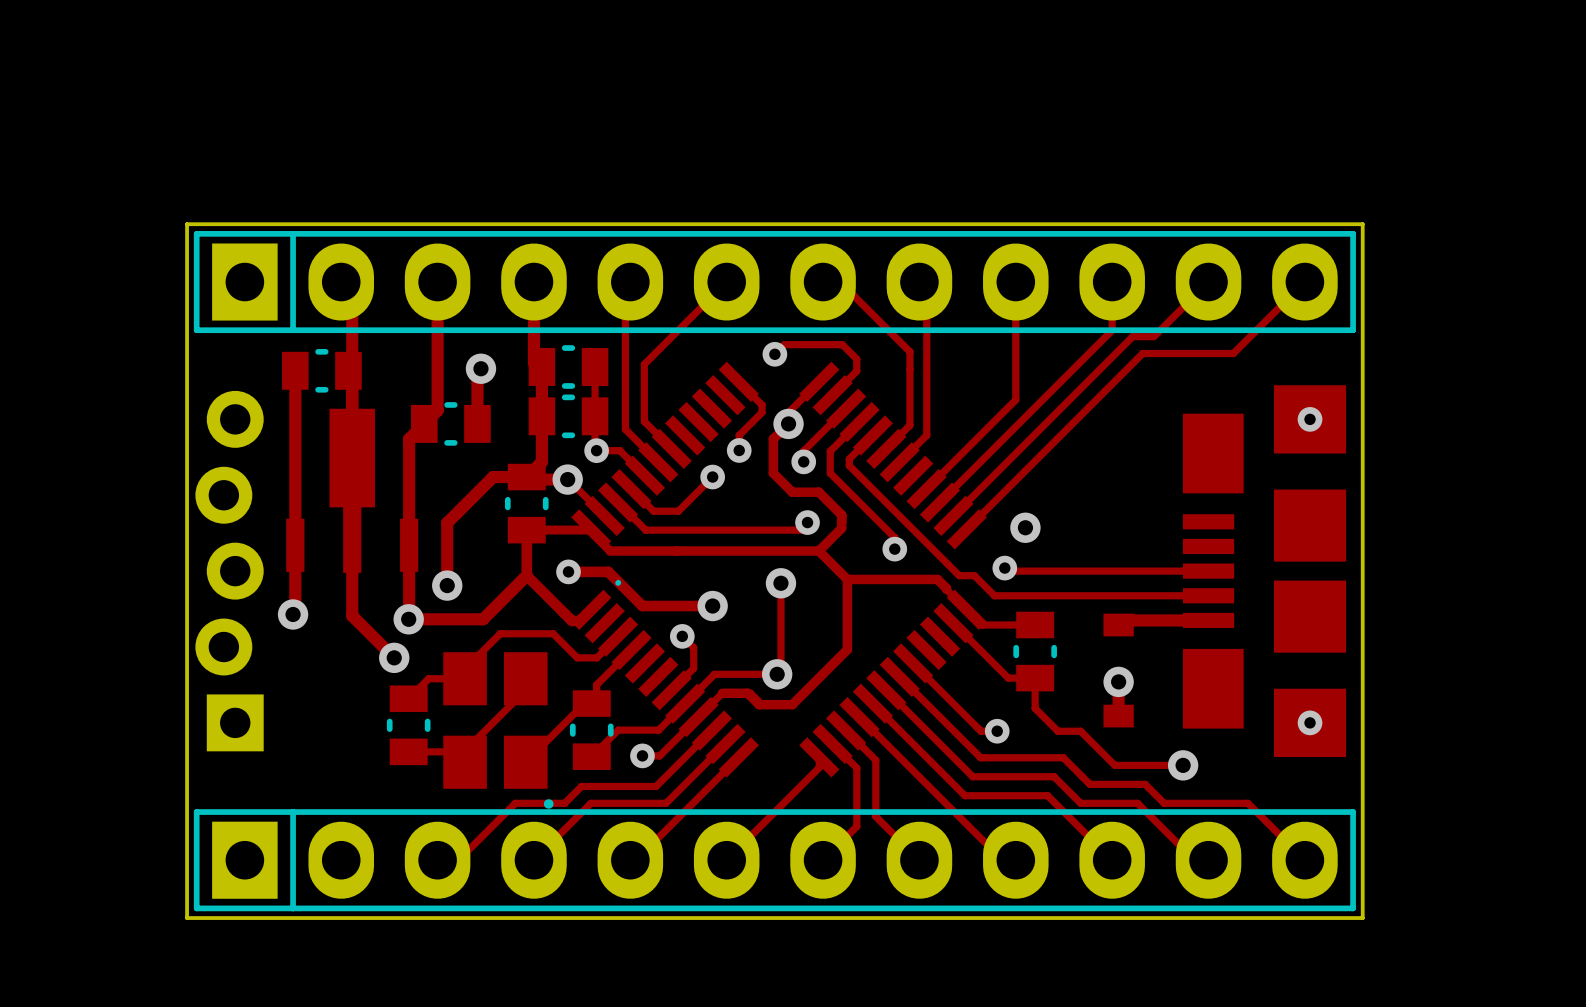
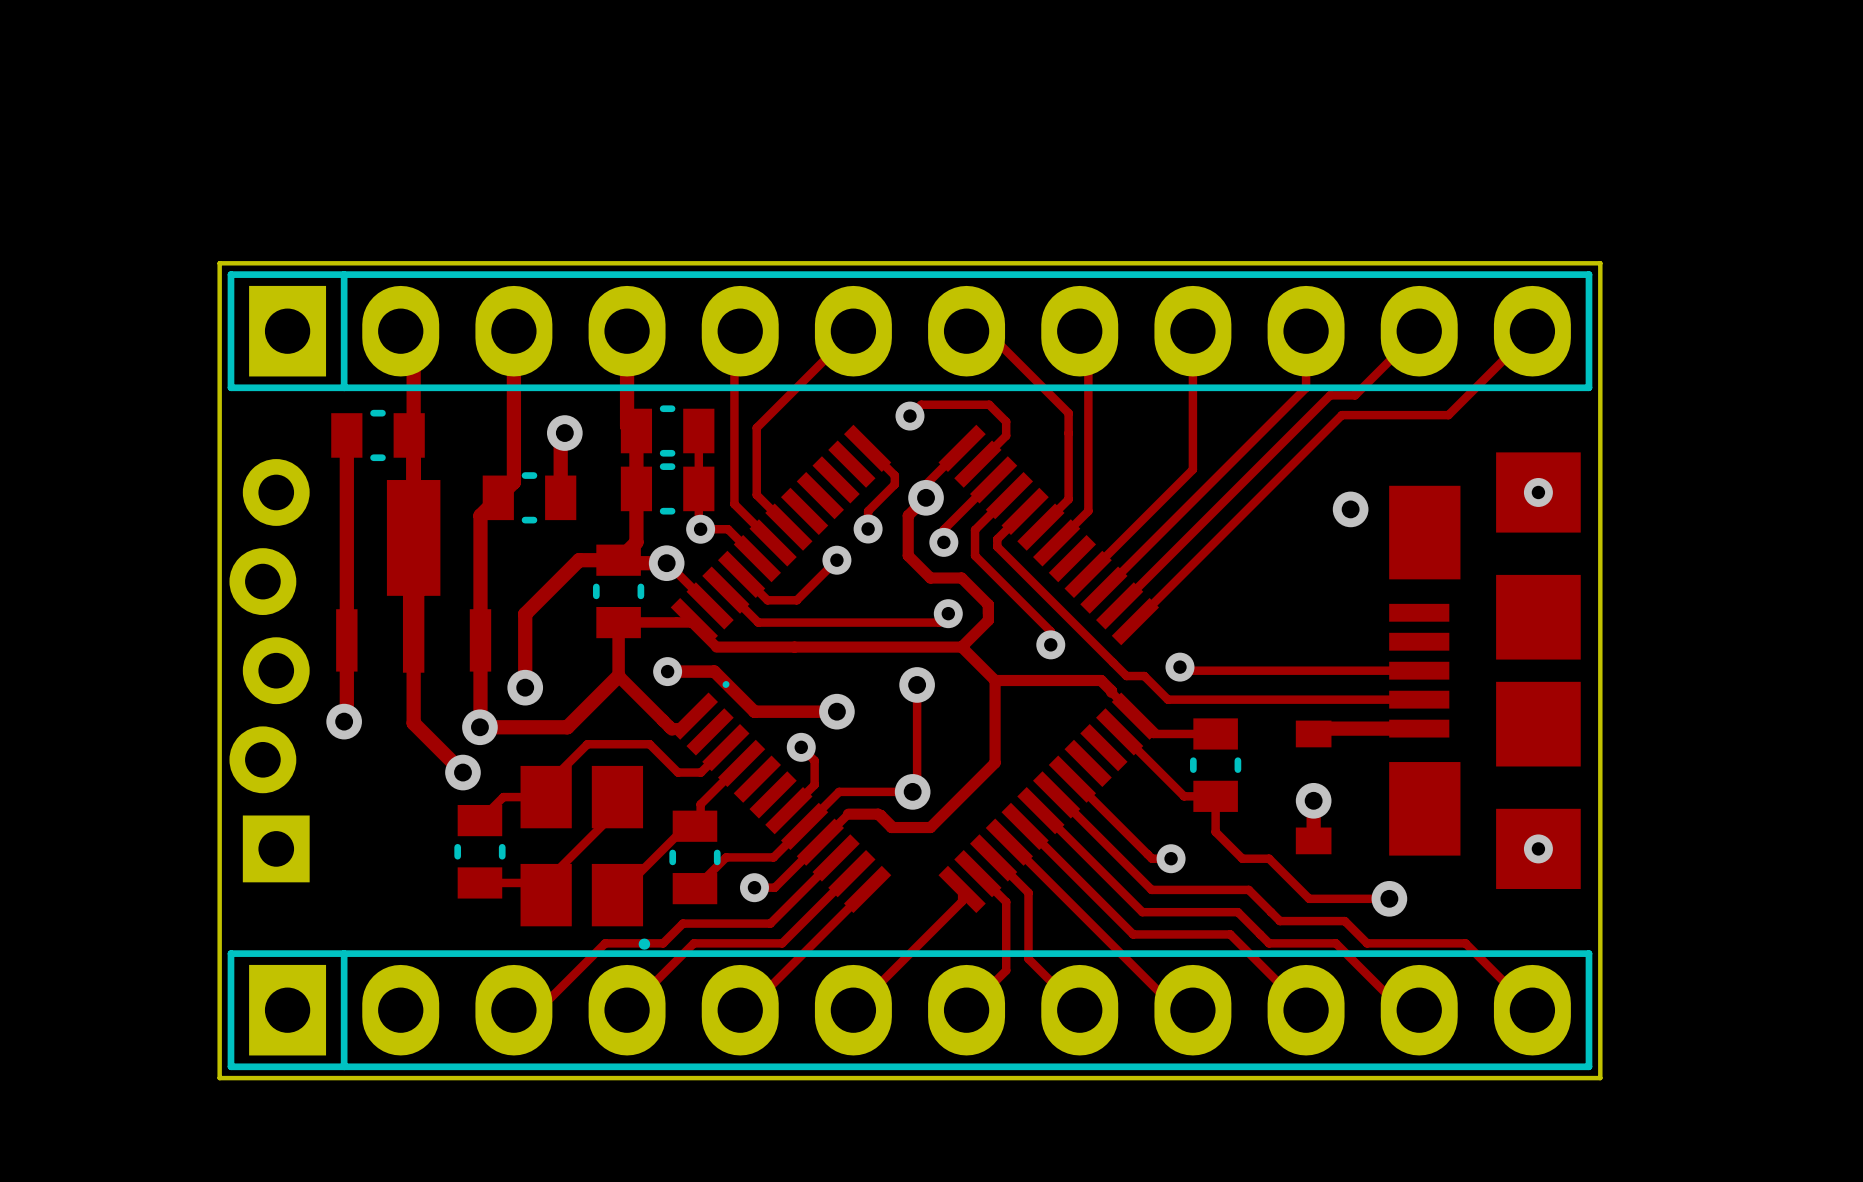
via position: (1025, 527) -> (1350, 509)

